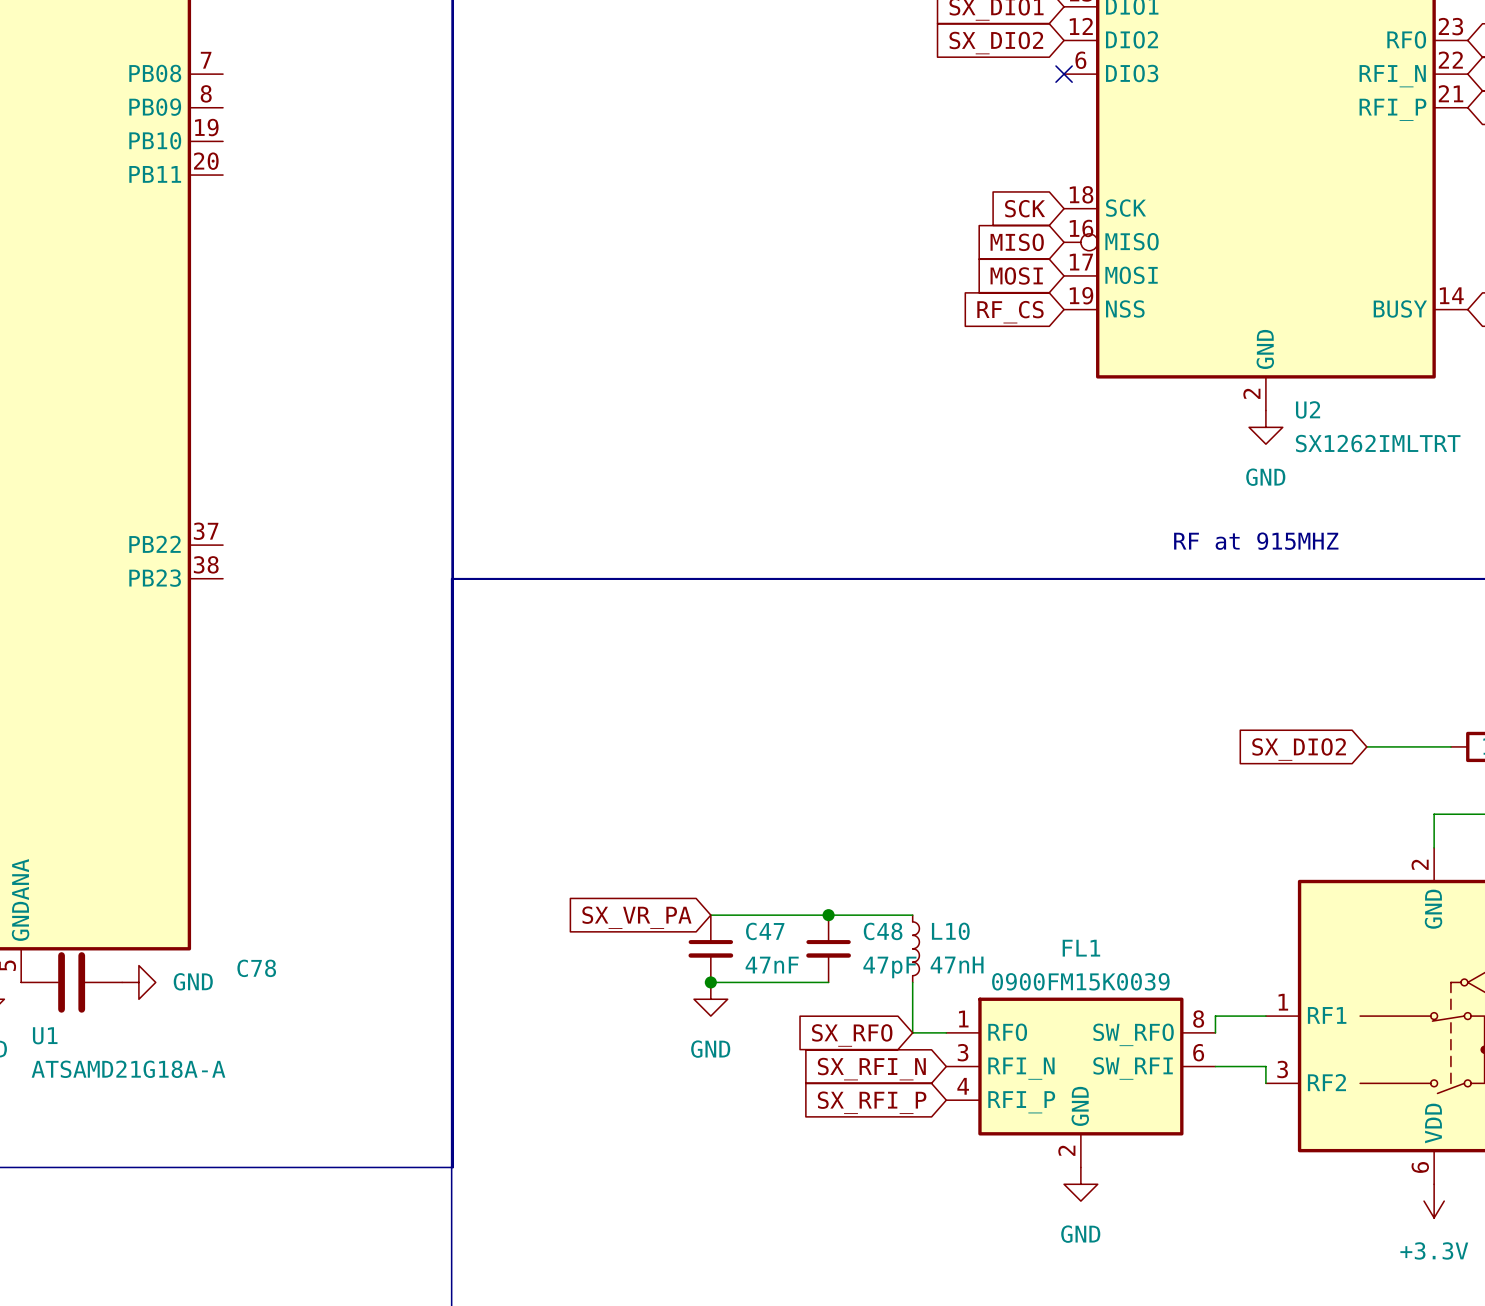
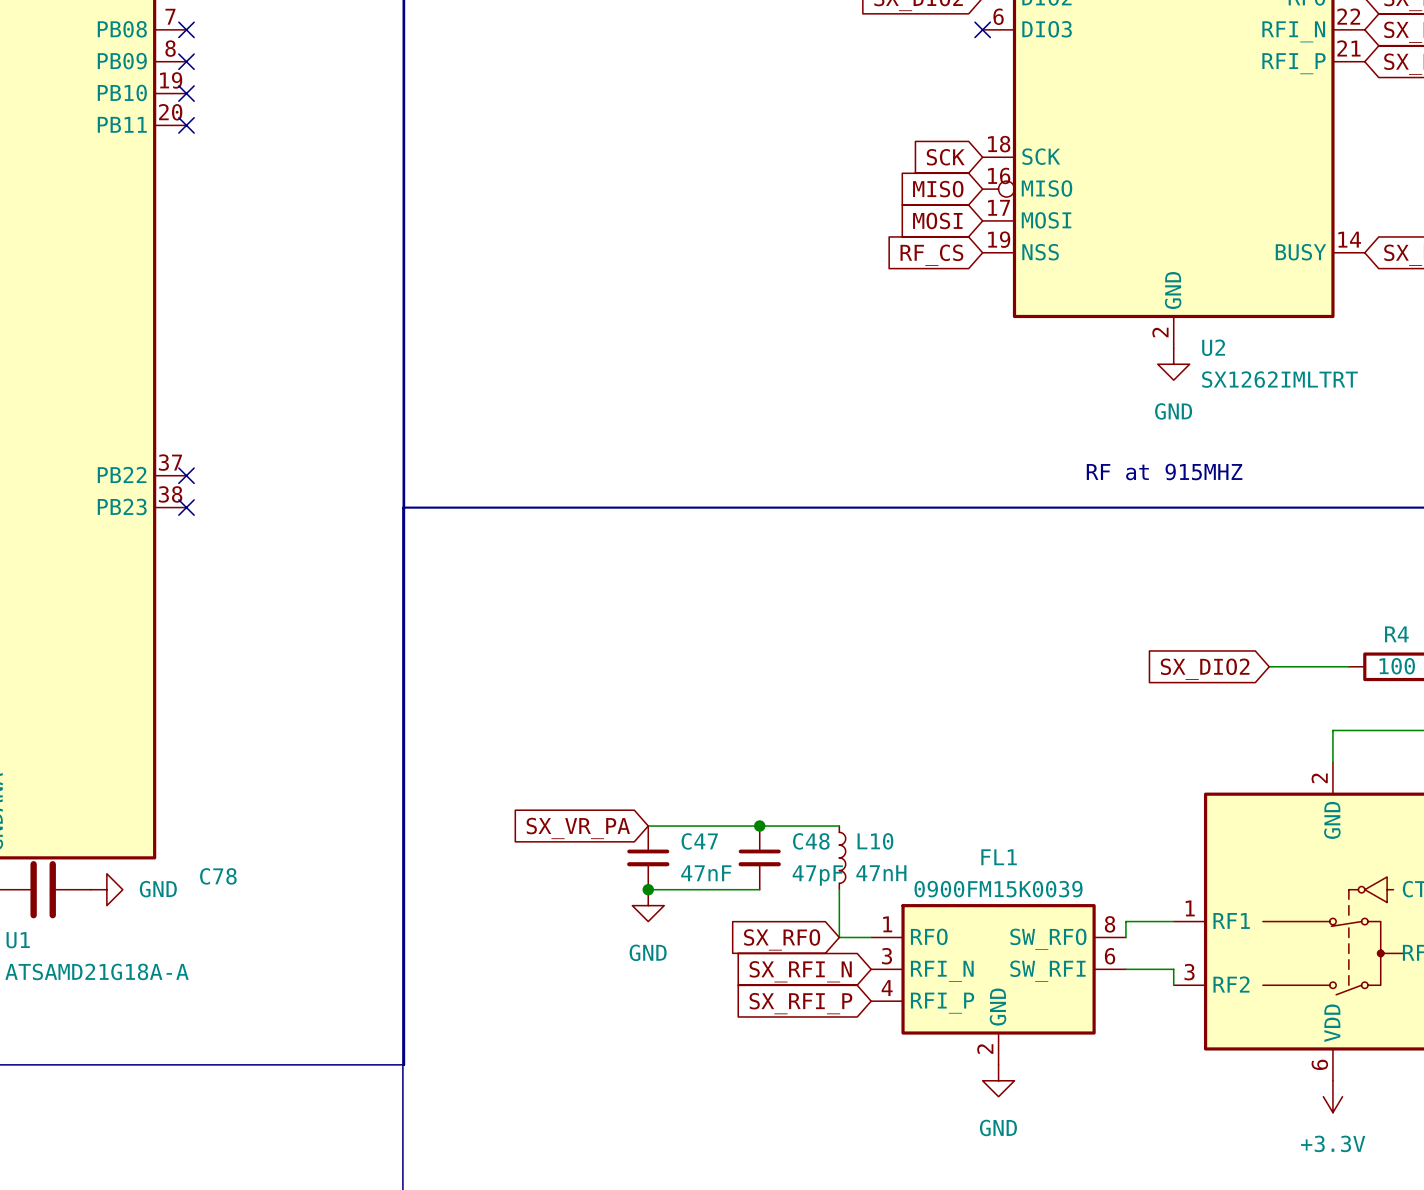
no-connect mark: none -> (186, 29)
no-connect mark: none -> (186, 61)
no-connect mark: none -> (186, 93)
no-connect mark: none -> (186, 125)
no-connect mark: none -> (186, 475)
no-connect mark: none -> (186, 507)

